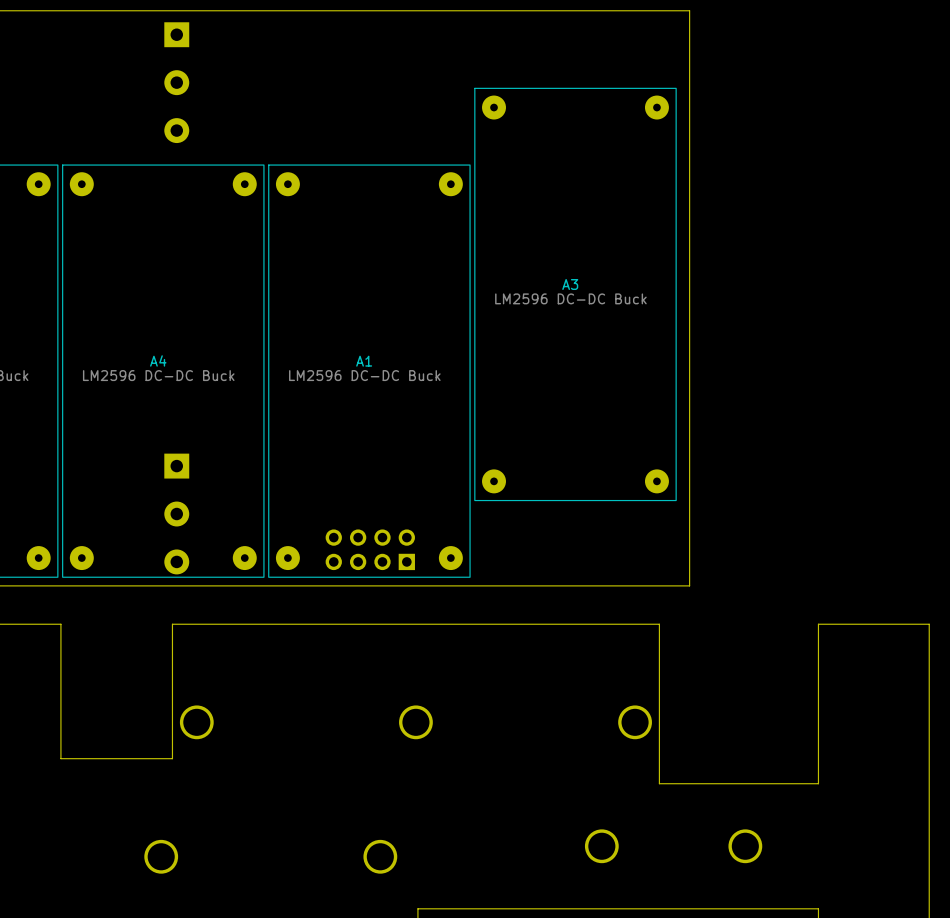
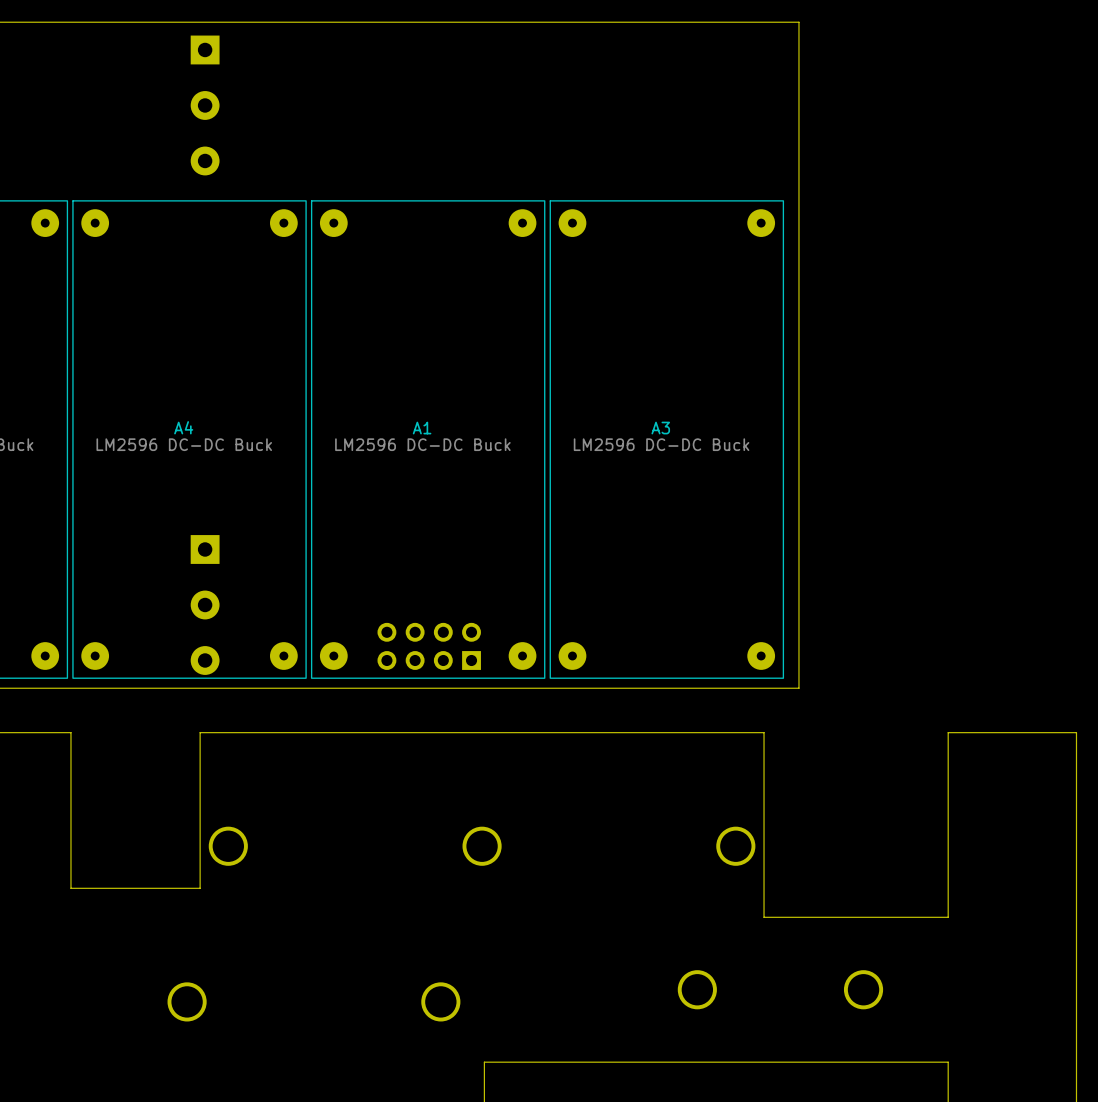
A3 position: (575, 294) -> (666, 439)

